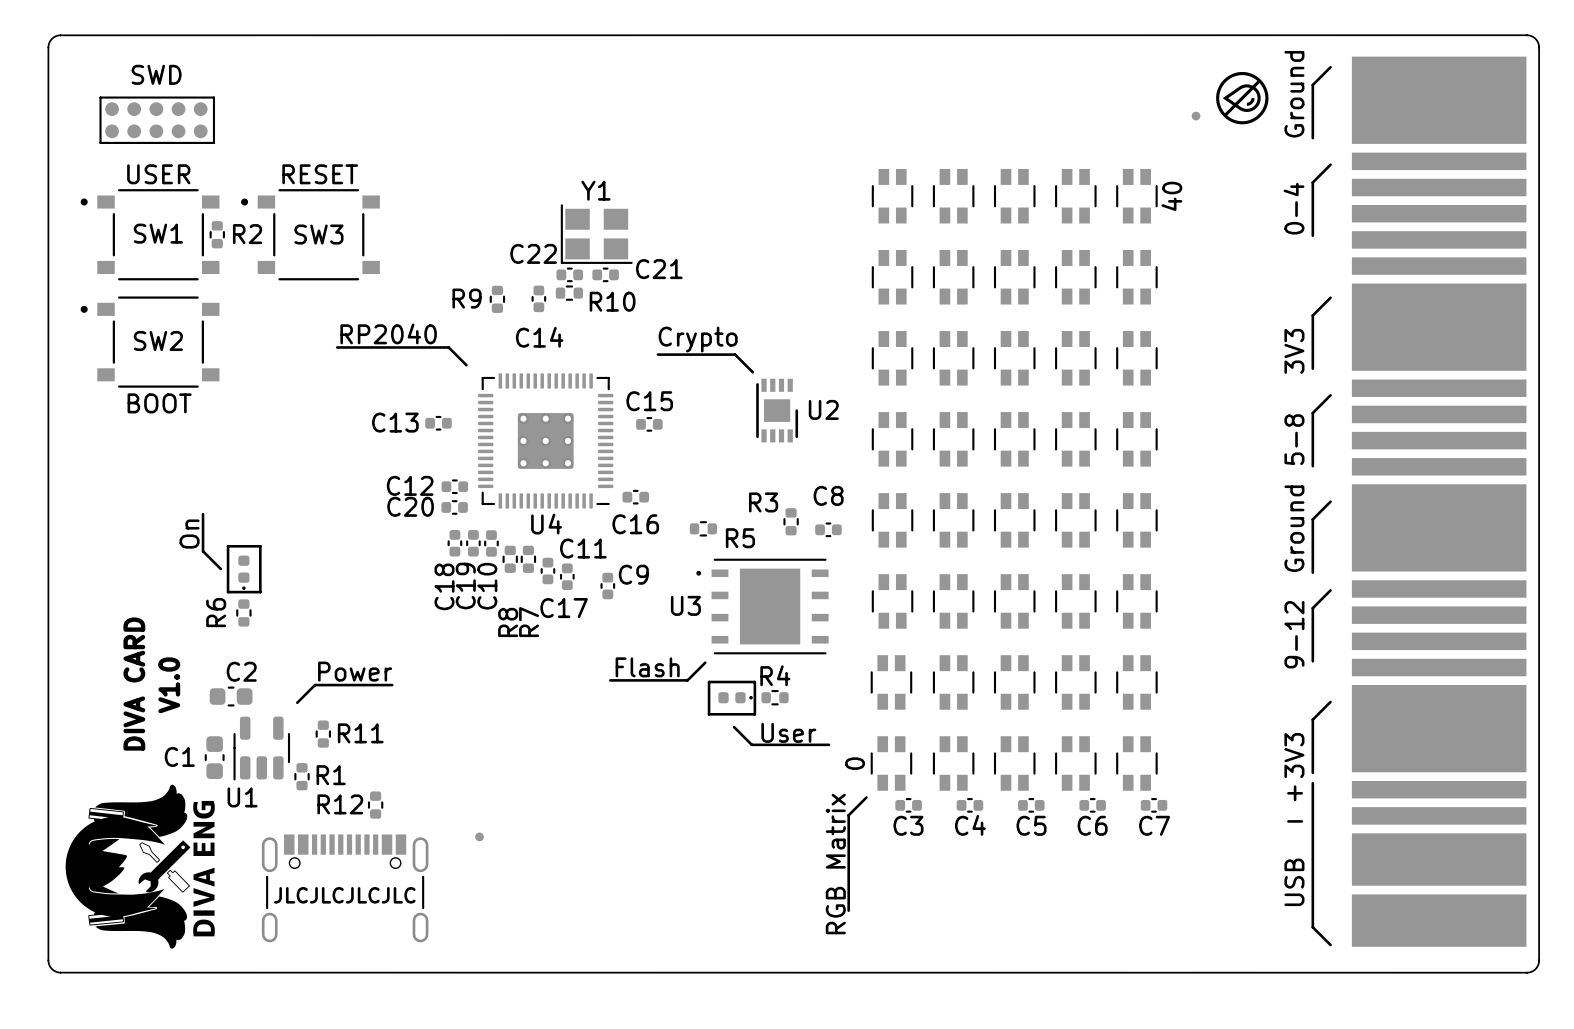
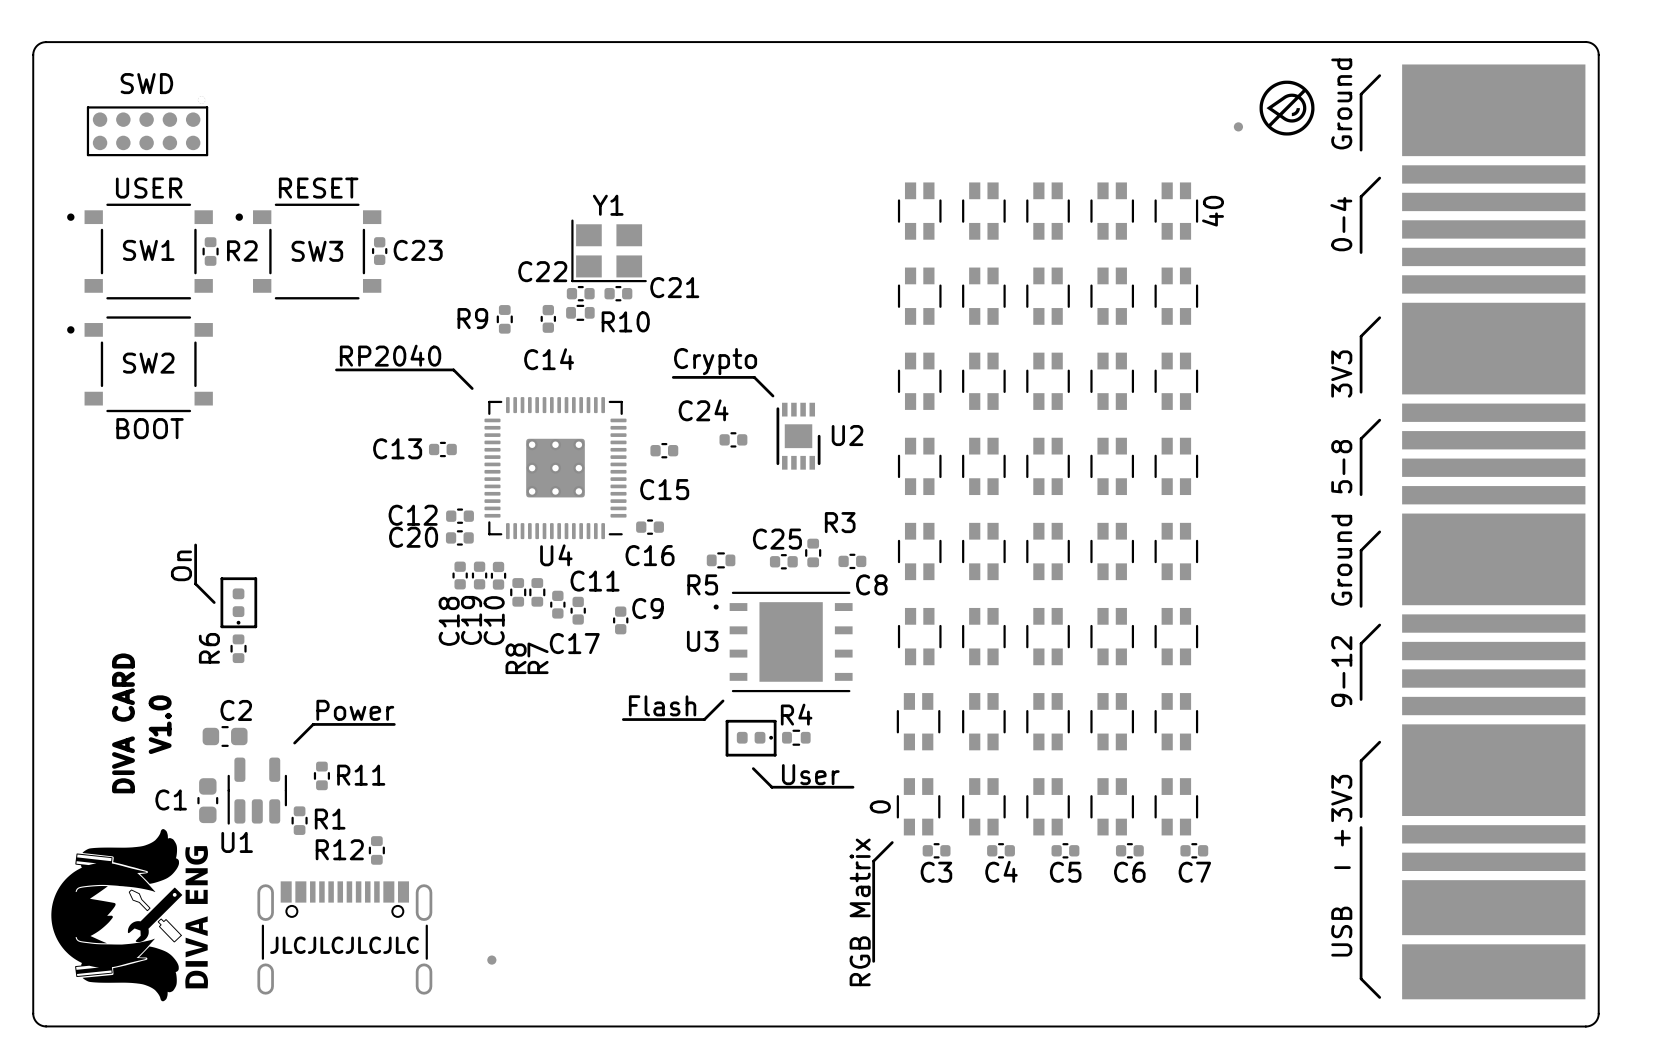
C23: none -> (379, 251)
C15 name position: C15 (649, 401) -> C15 (664, 489)
C24: none -> (733, 439)
C8 name position: C8 (828, 495) -> C8 (871, 584)
R3 name position: R3 (763, 502) -> R3 (840, 522)
C25: none -> (783, 561)
R5 name position: R5 (740, 538) -> R5 (702, 584)
part position: (479, 836) -> (491, 960)

